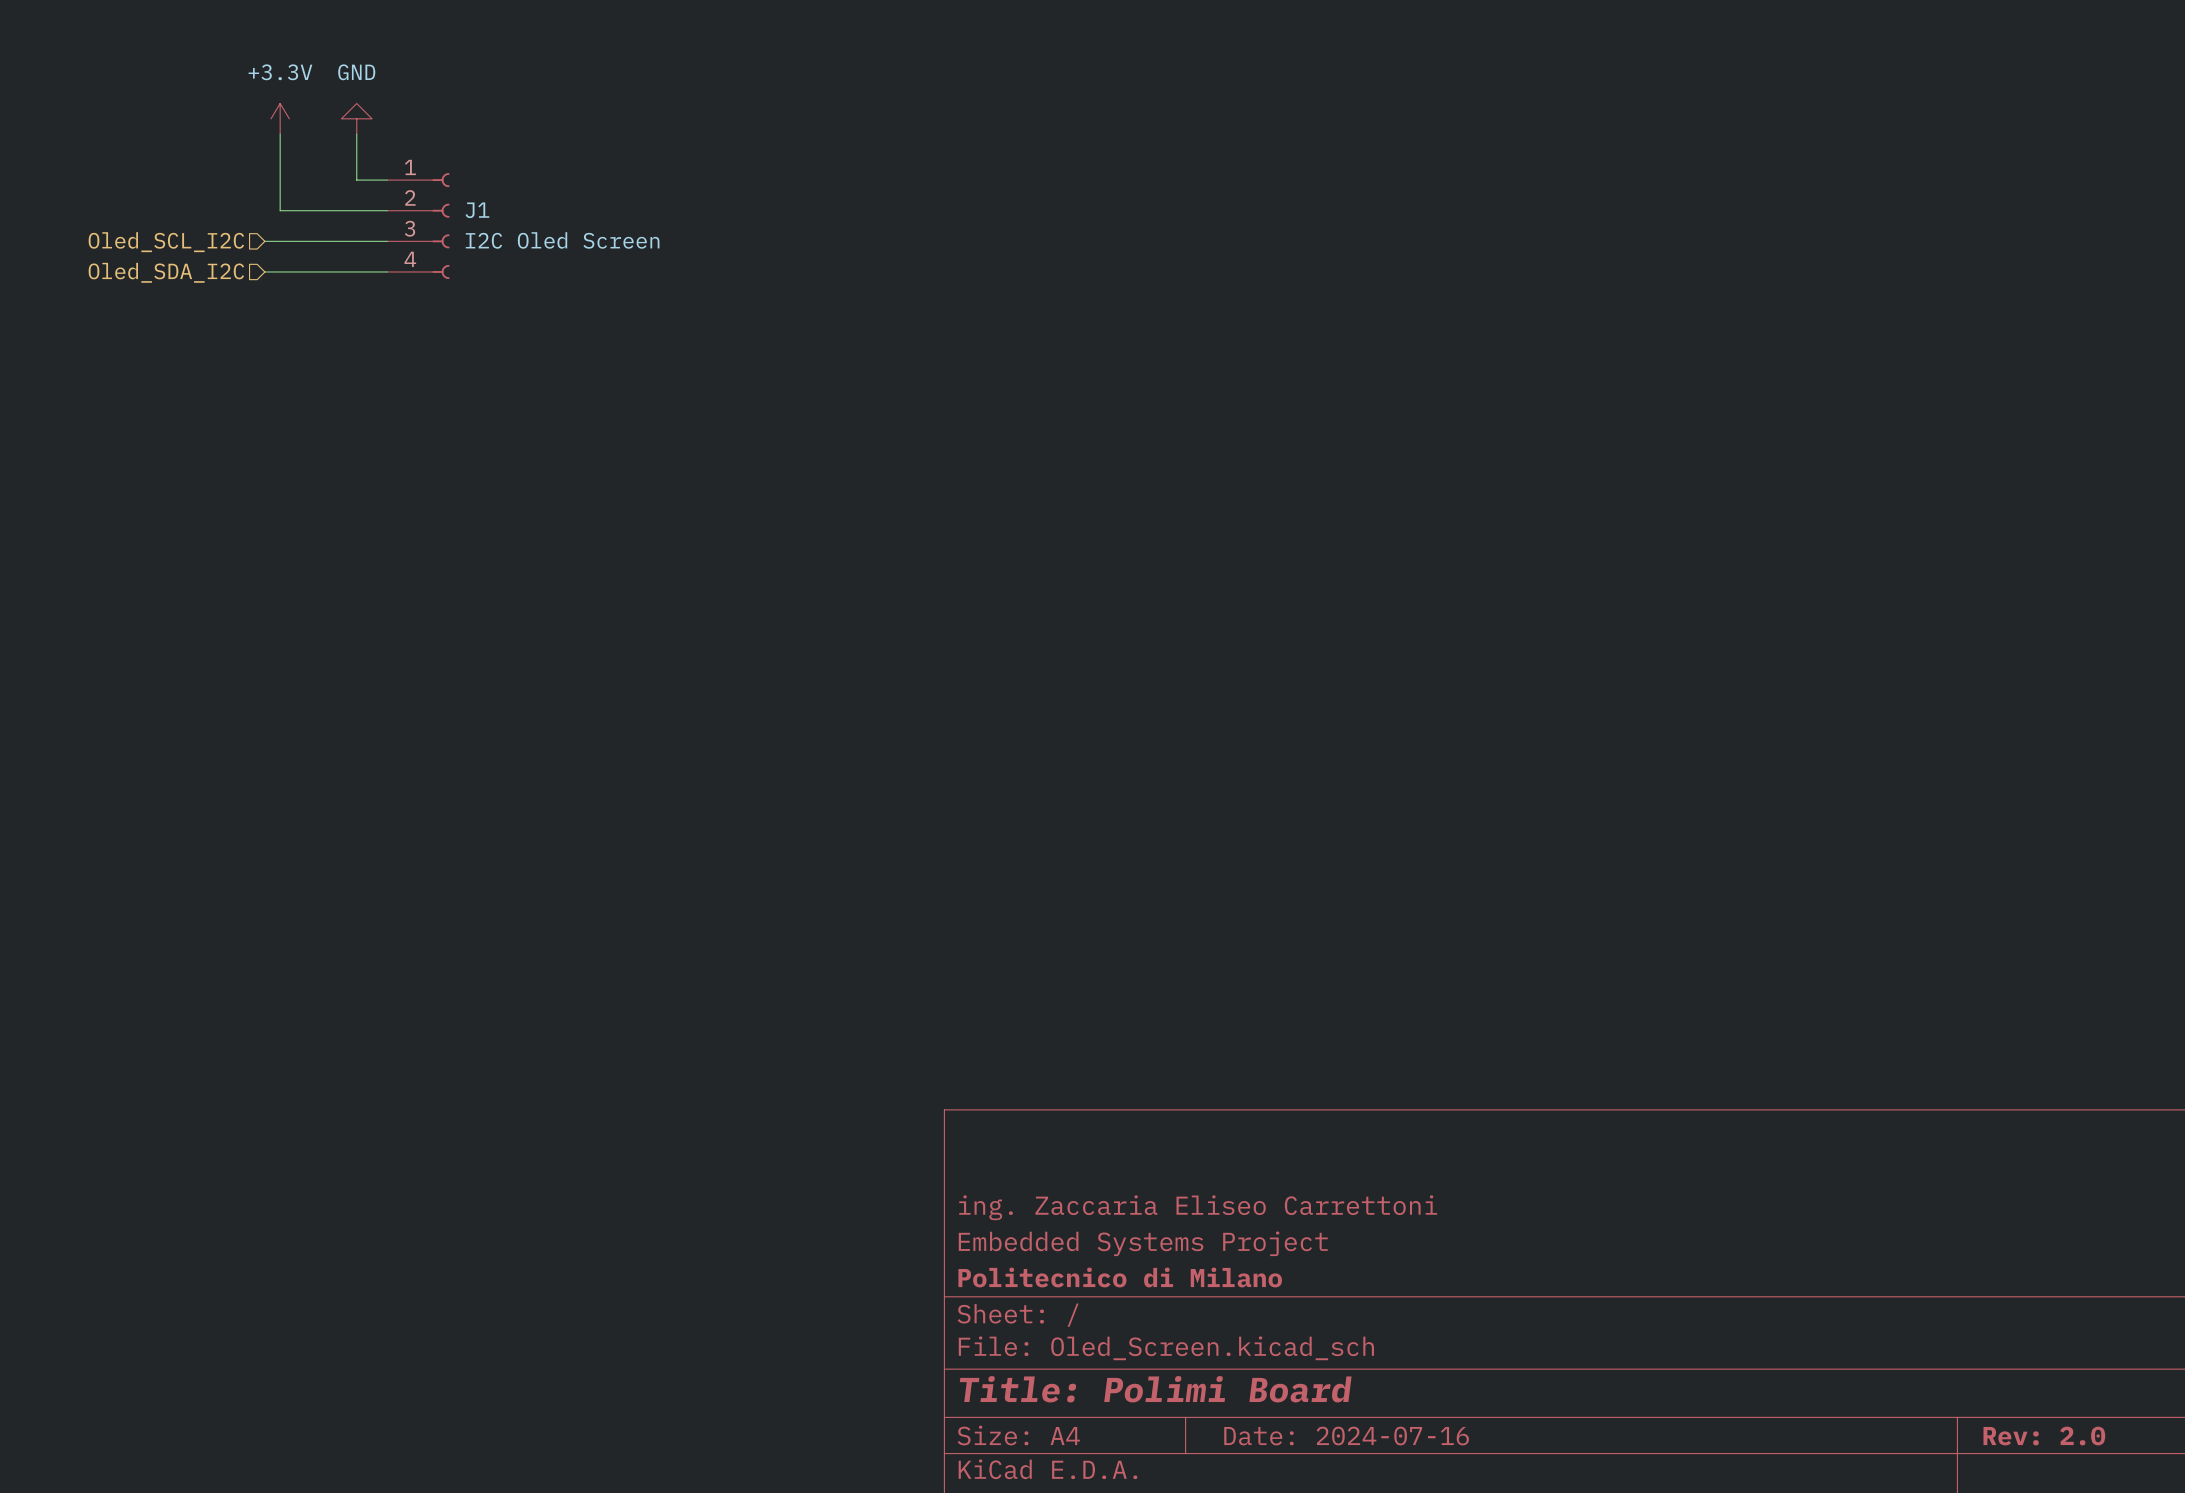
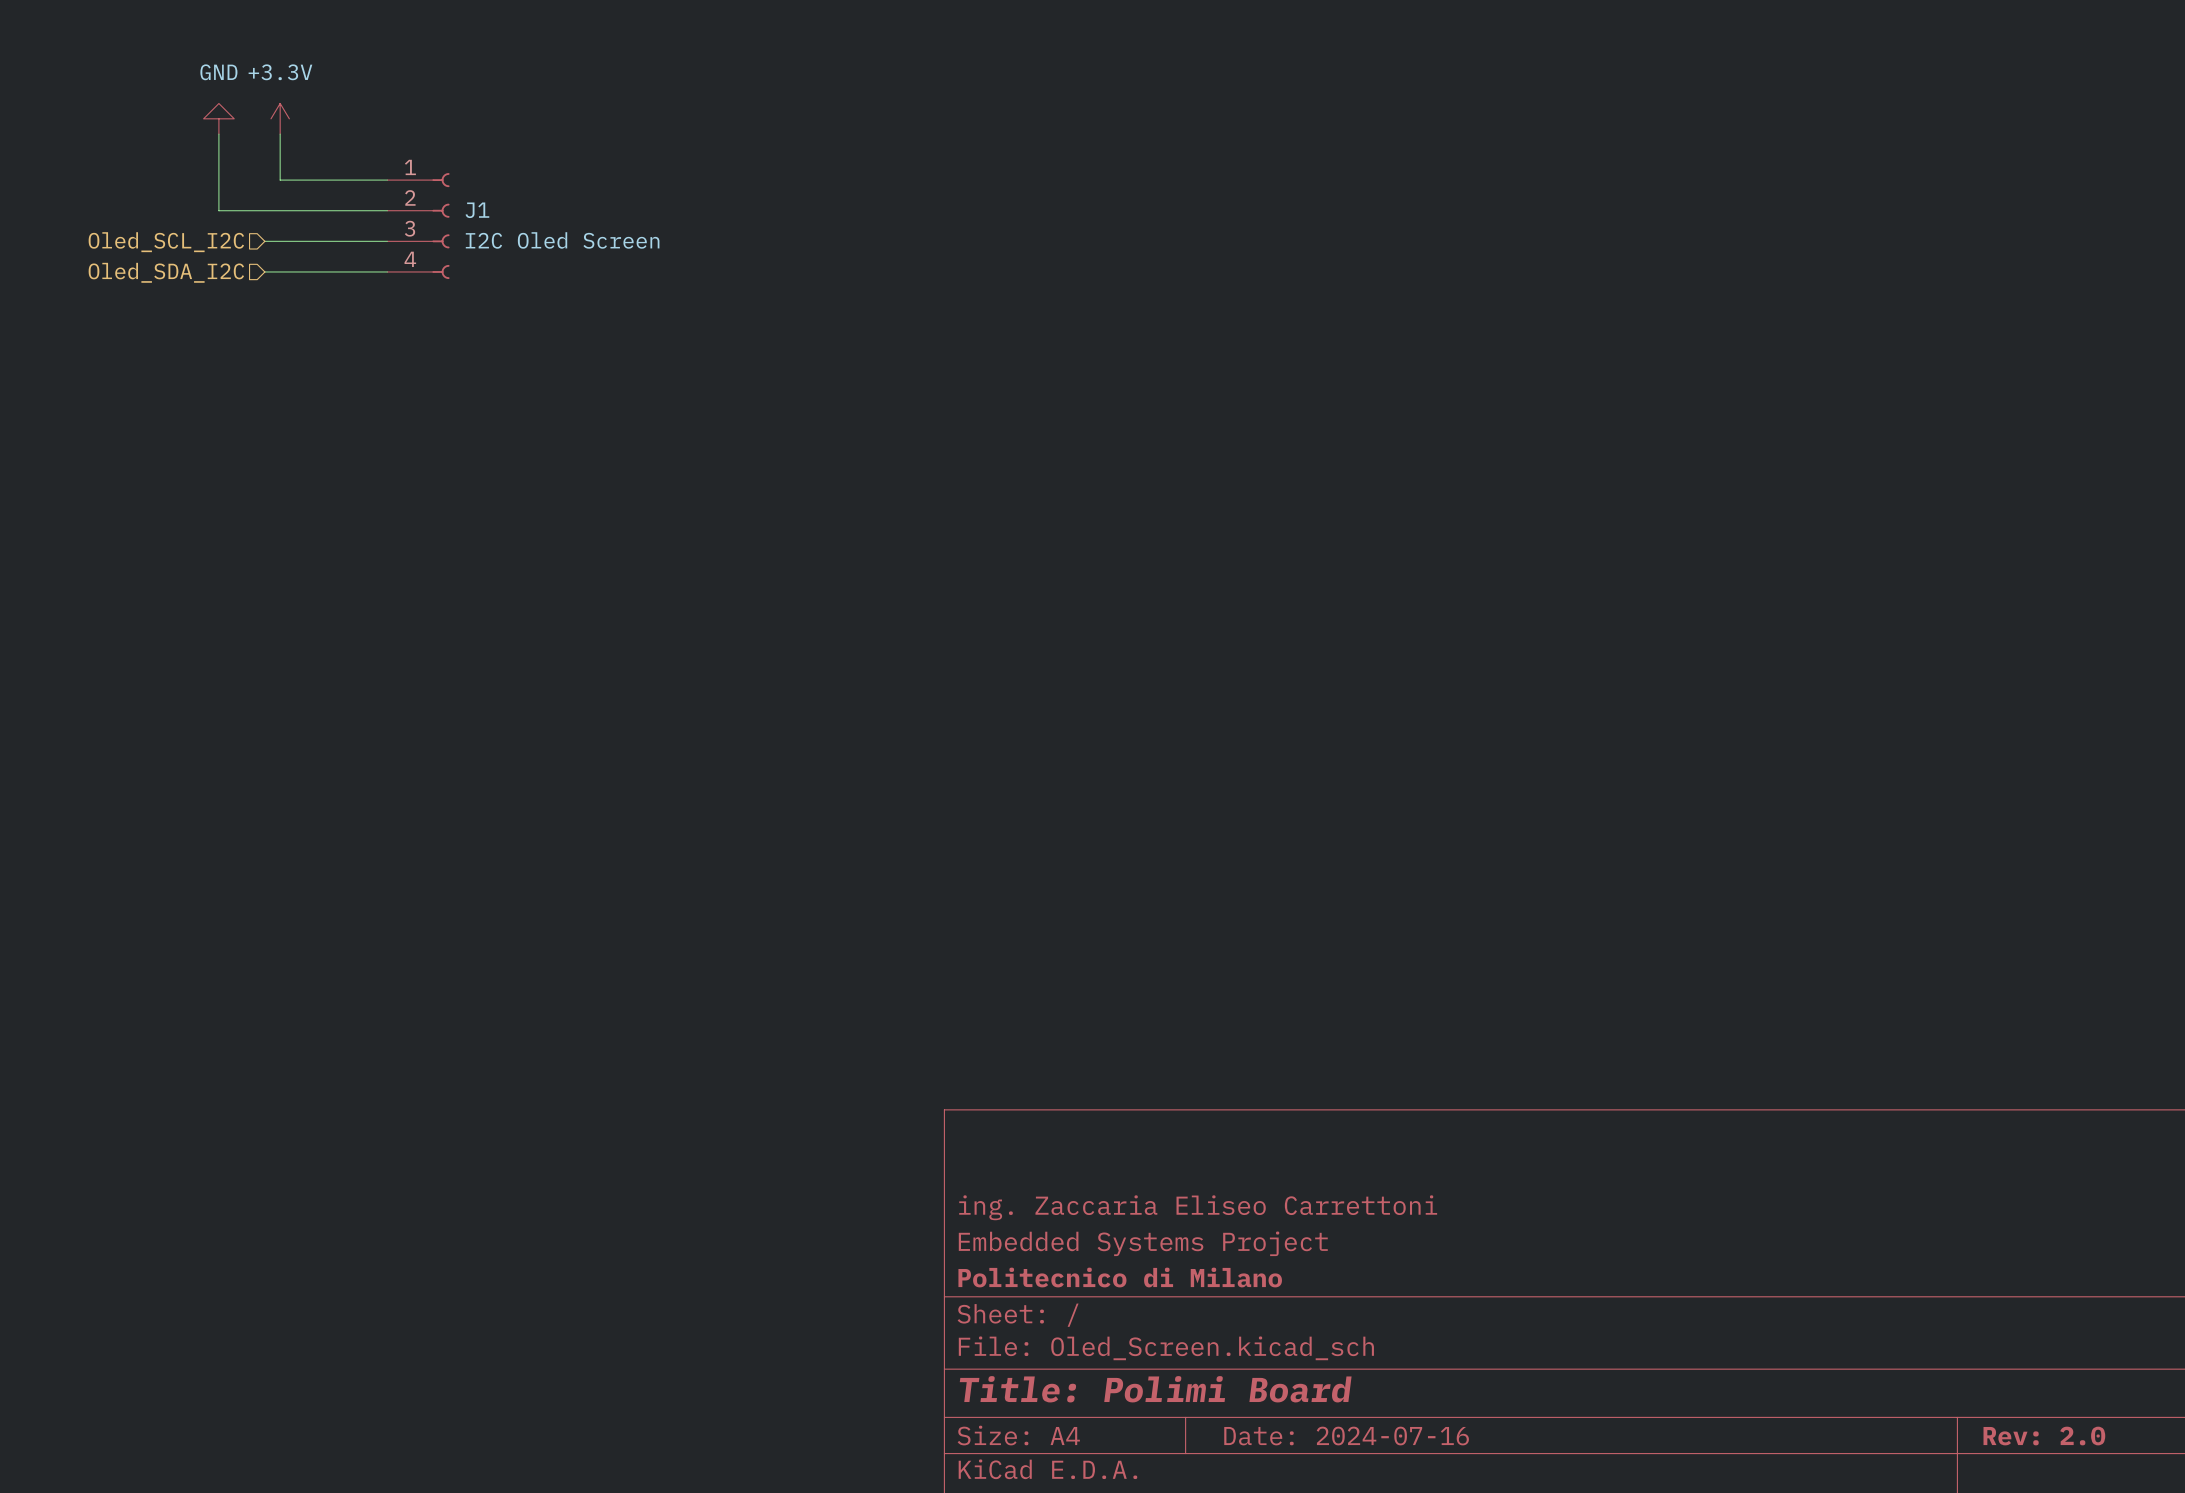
power symbol position: GND (356, 118) -> GND (218, 118)
wire: (356, 134) (356, 180) -> (280, 180) (356, 180)
wire: (280, 180) (280, 210) -> (218, 134) (218, 210) (280, 210)

